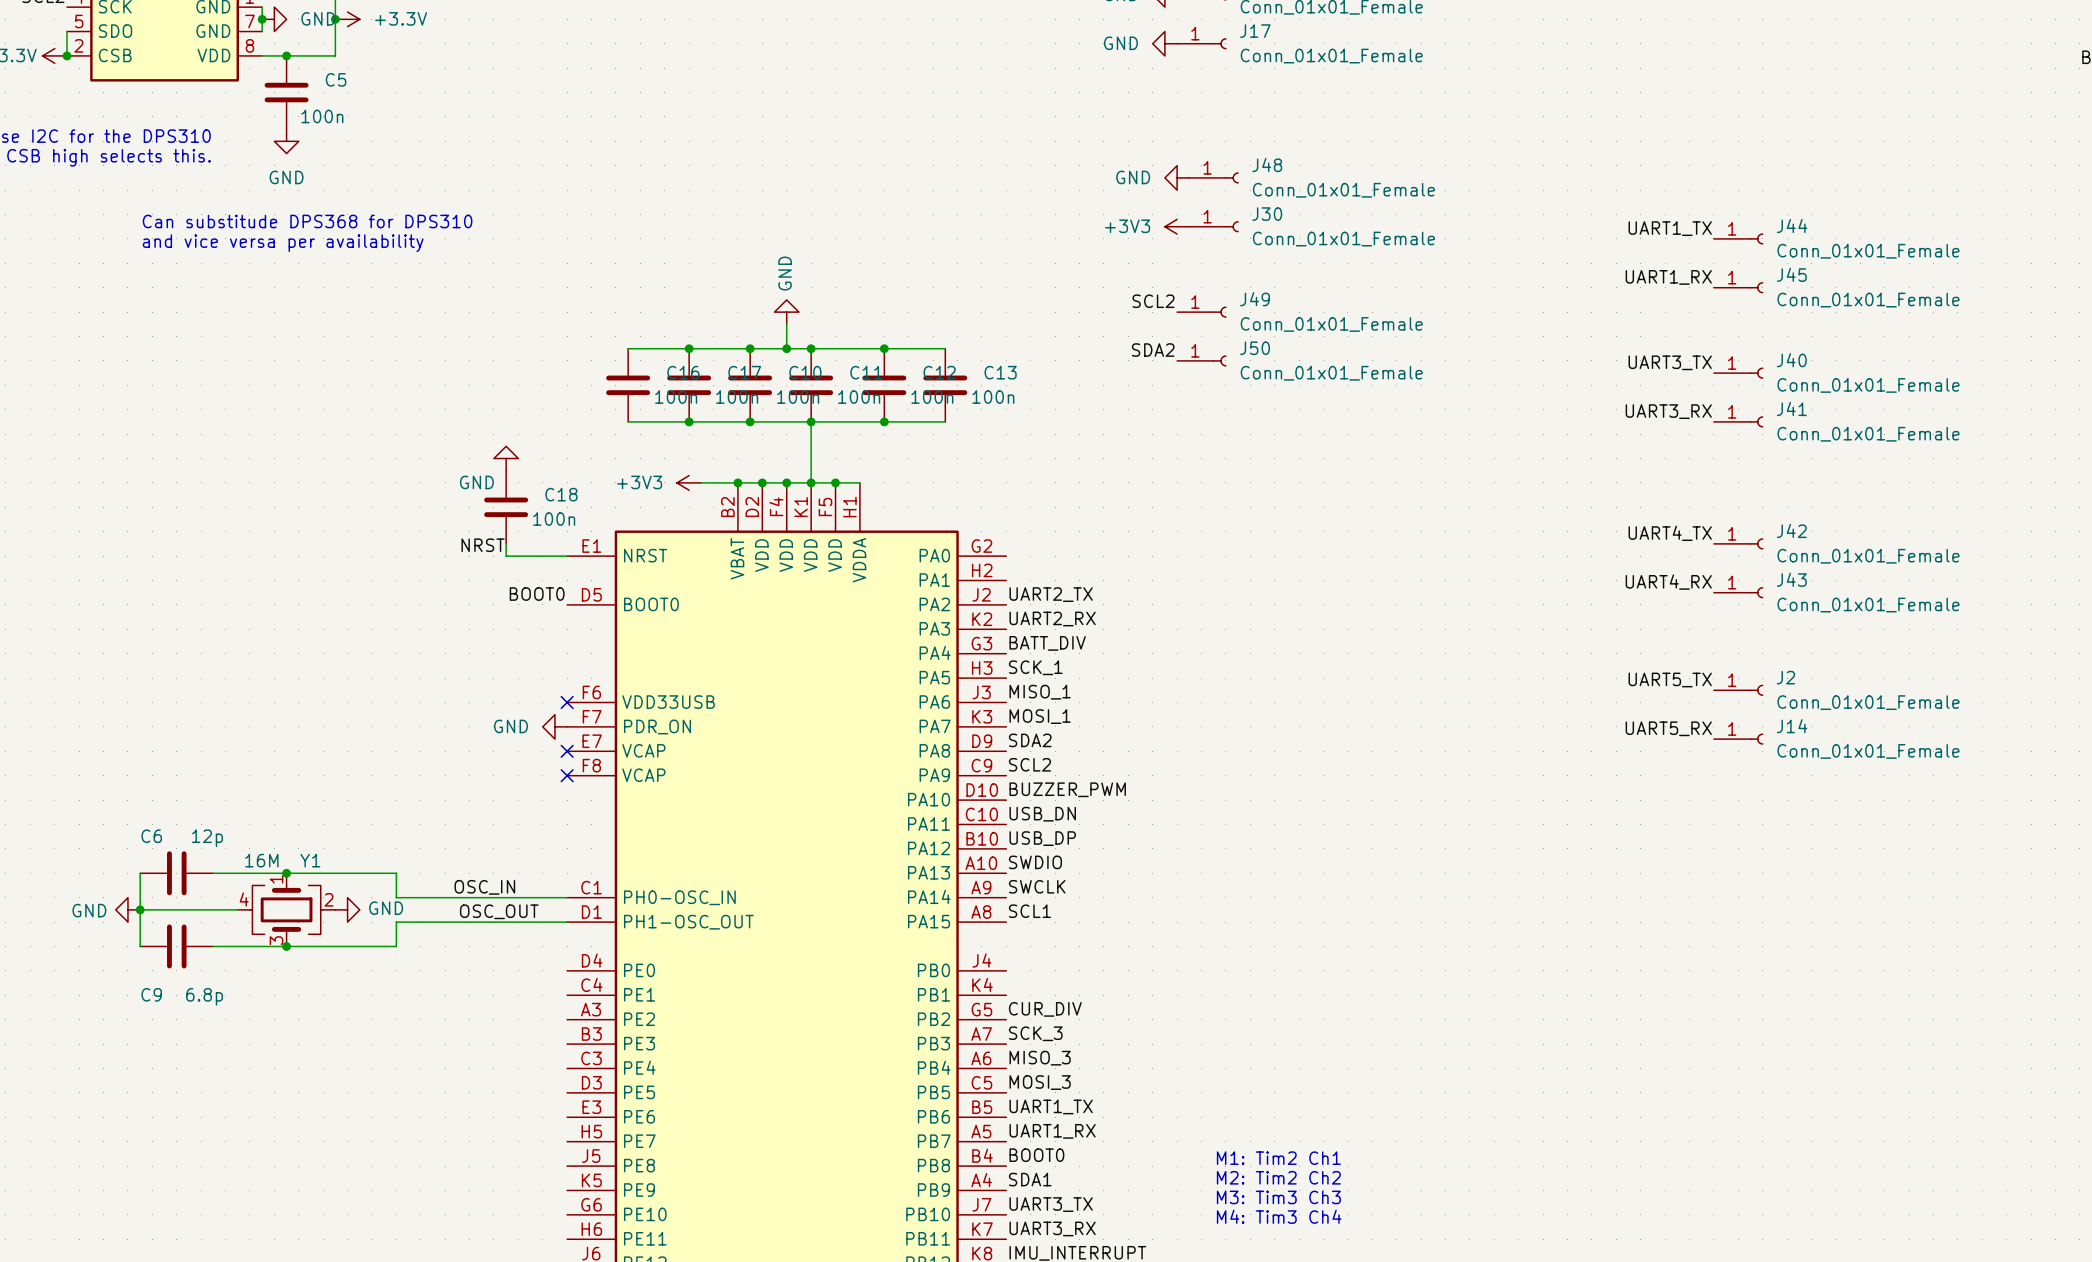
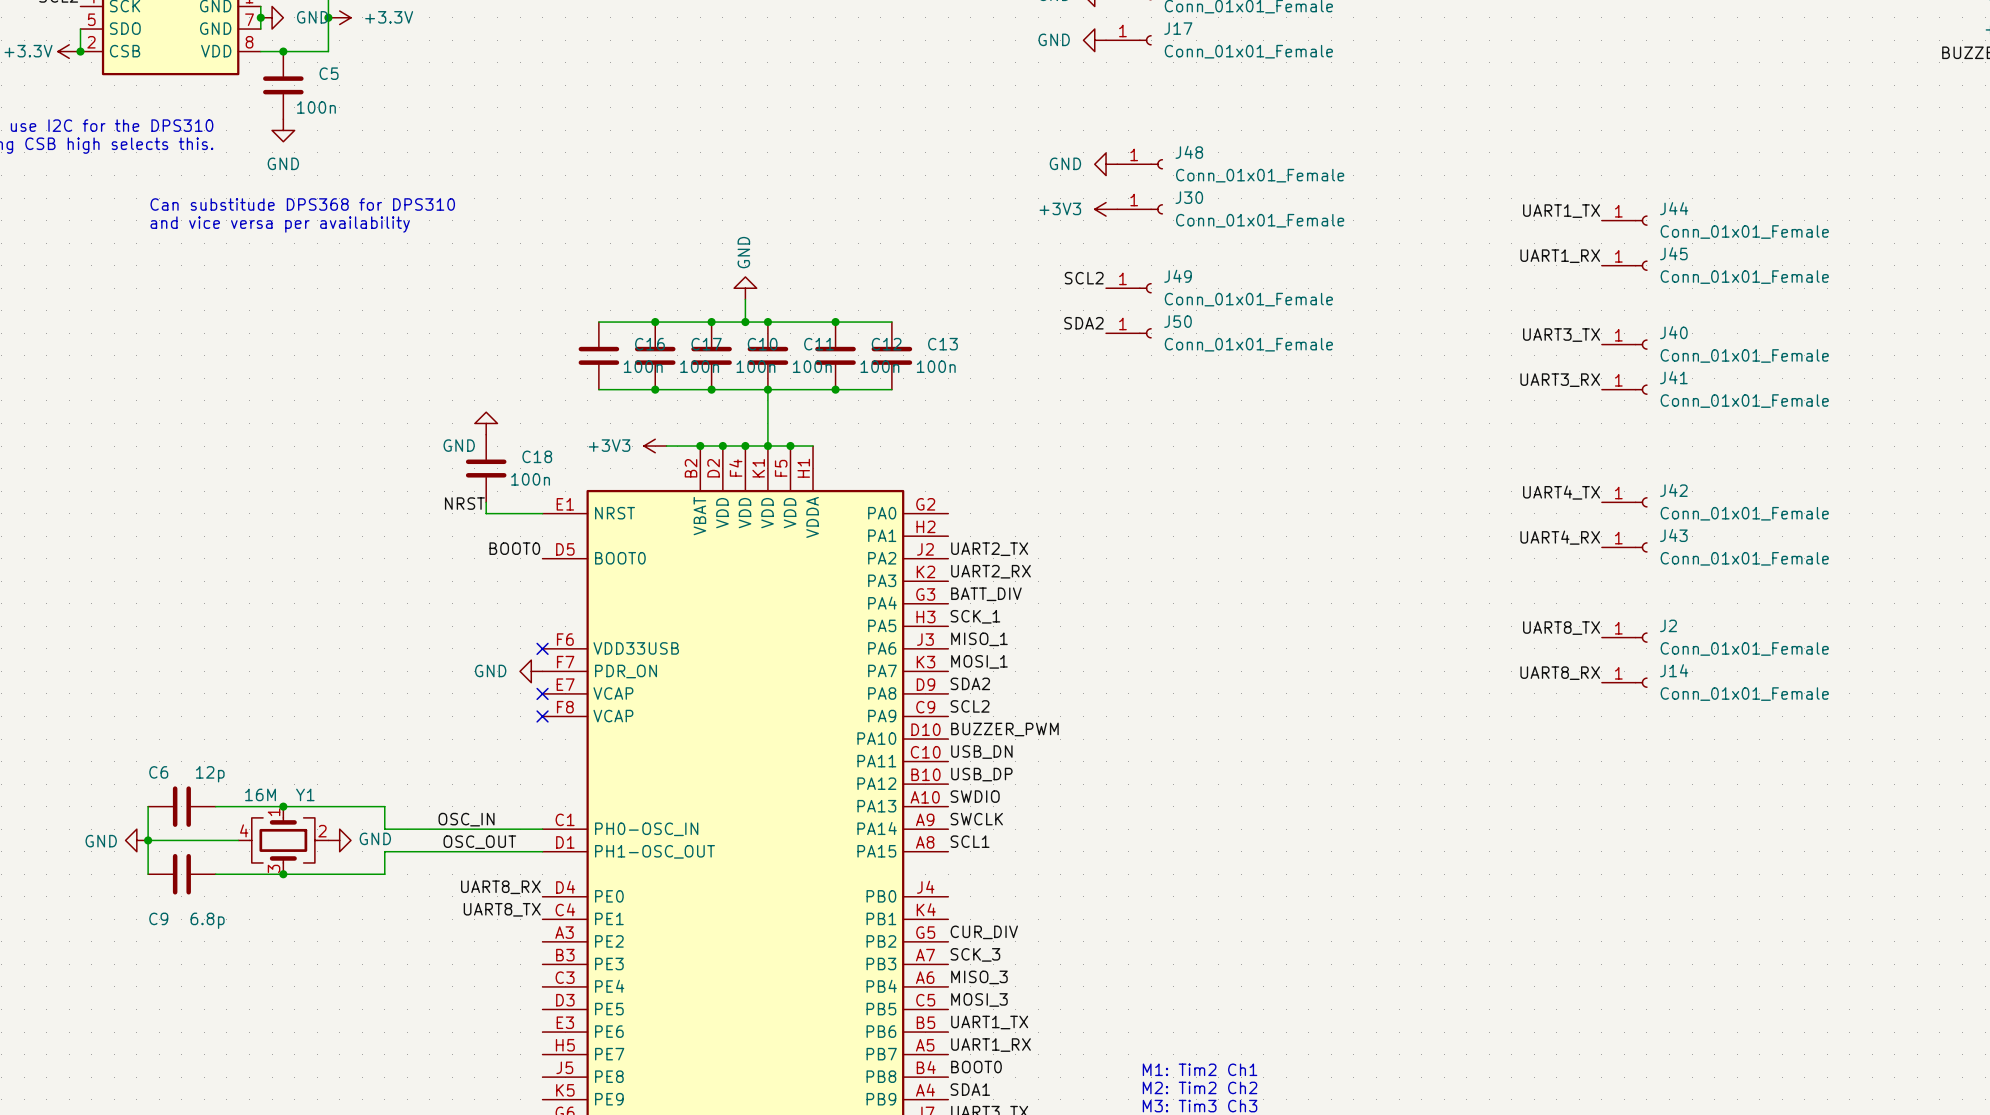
label: UART5_TX (1670, 679) -> UART8_TX (1561, 628)
label: UART5_RX (1668, 728) -> UART8_RX (1560, 673)
label: none -> UART8_RX (500, 887)
label: none -> UART8_TX (502, 909)

